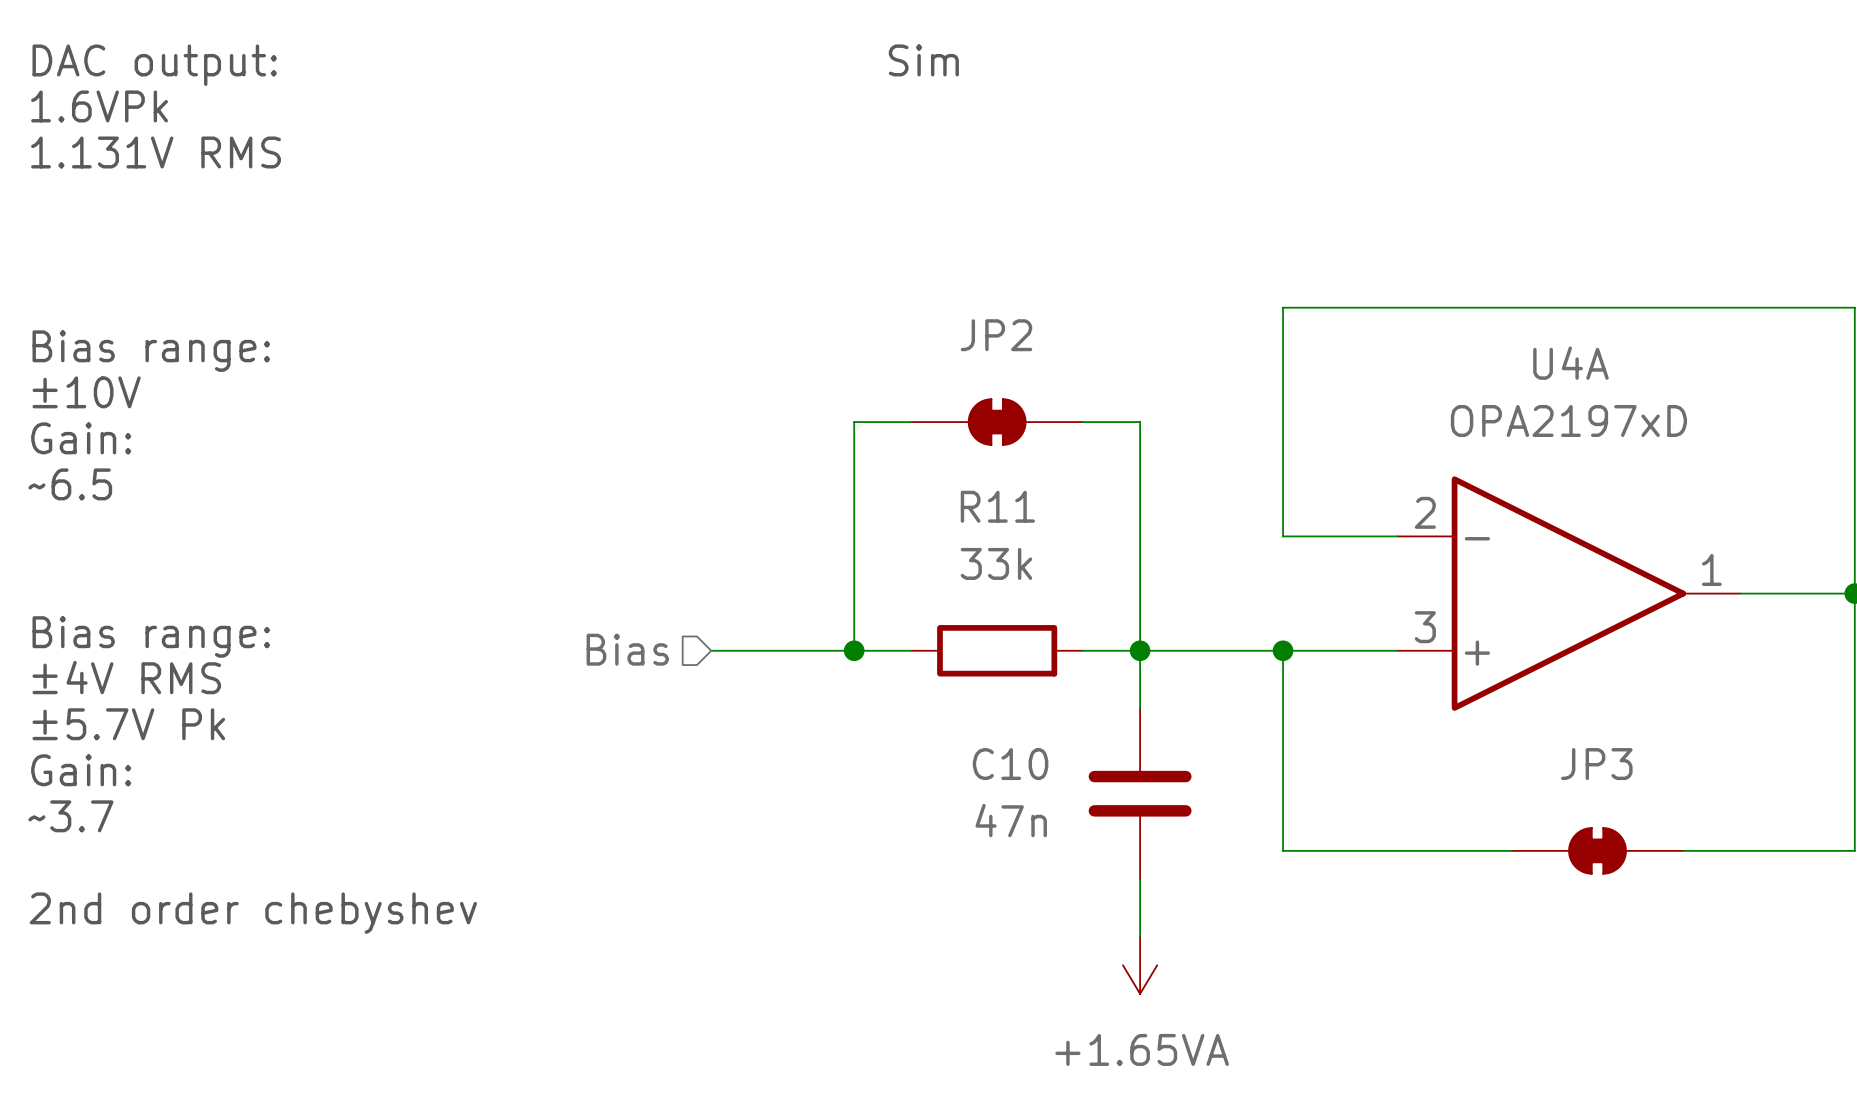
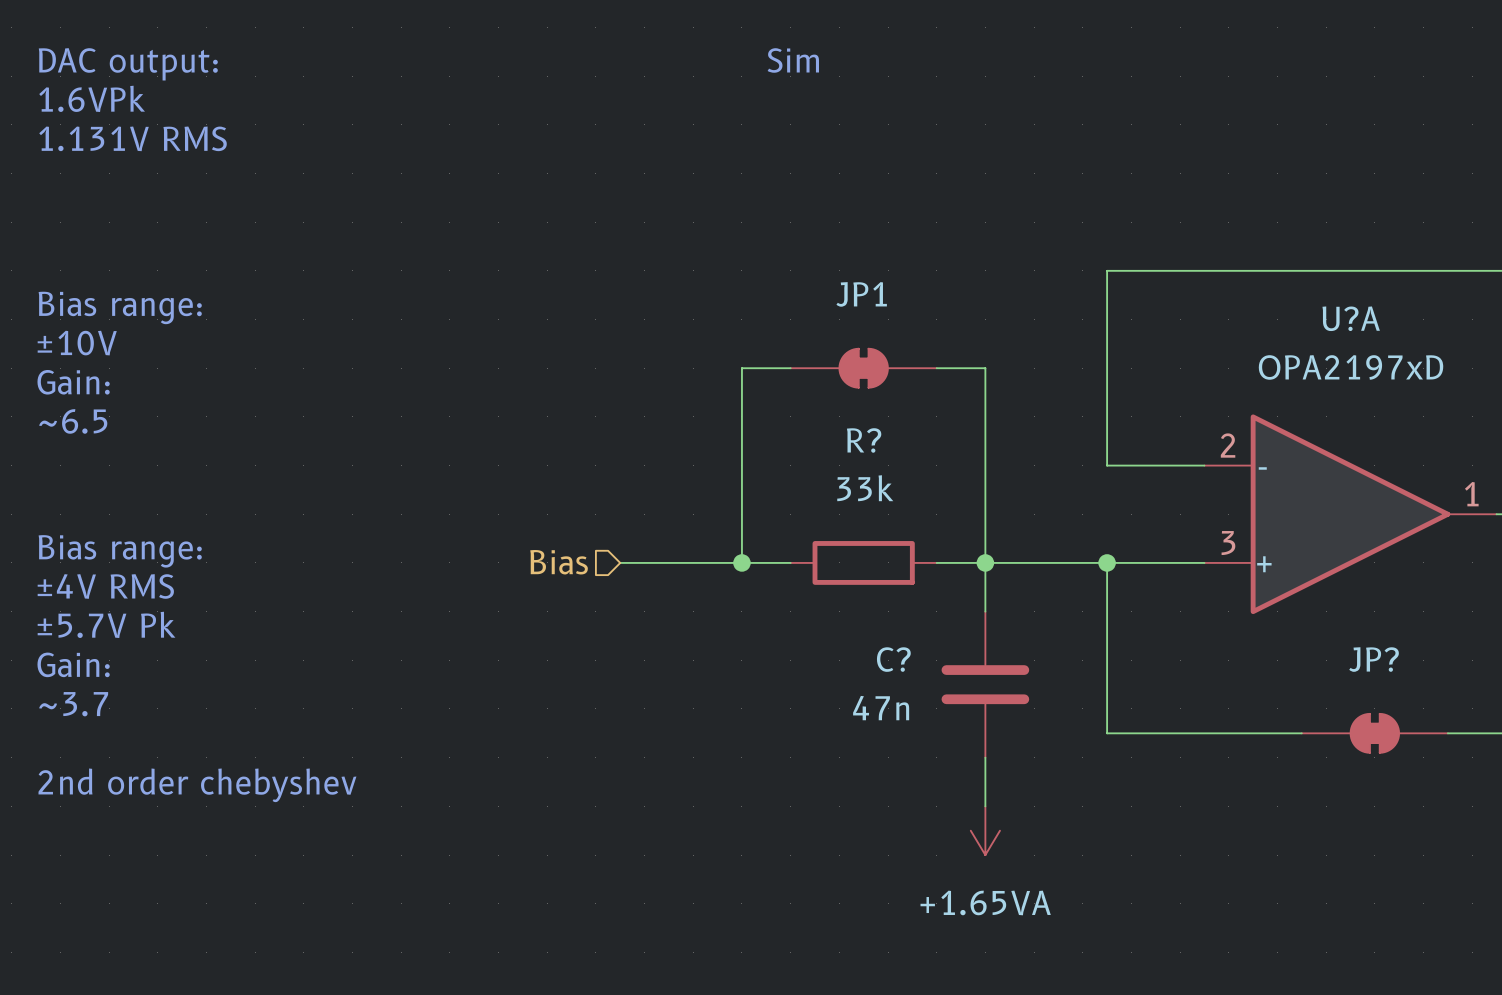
JP2 name: JP2 (996, 335) -> JP1 (861, 294)
U4A name: U4A (1570, 363) -> U?A (1351, 318)
R11 name: R11 (997, 506) -> R? (864, 440)
C10 name: C10 (1010, 764) -> C? (893, 659)
JP3 name: JP3 (1596, 764) -> JP? (1374, 659)

